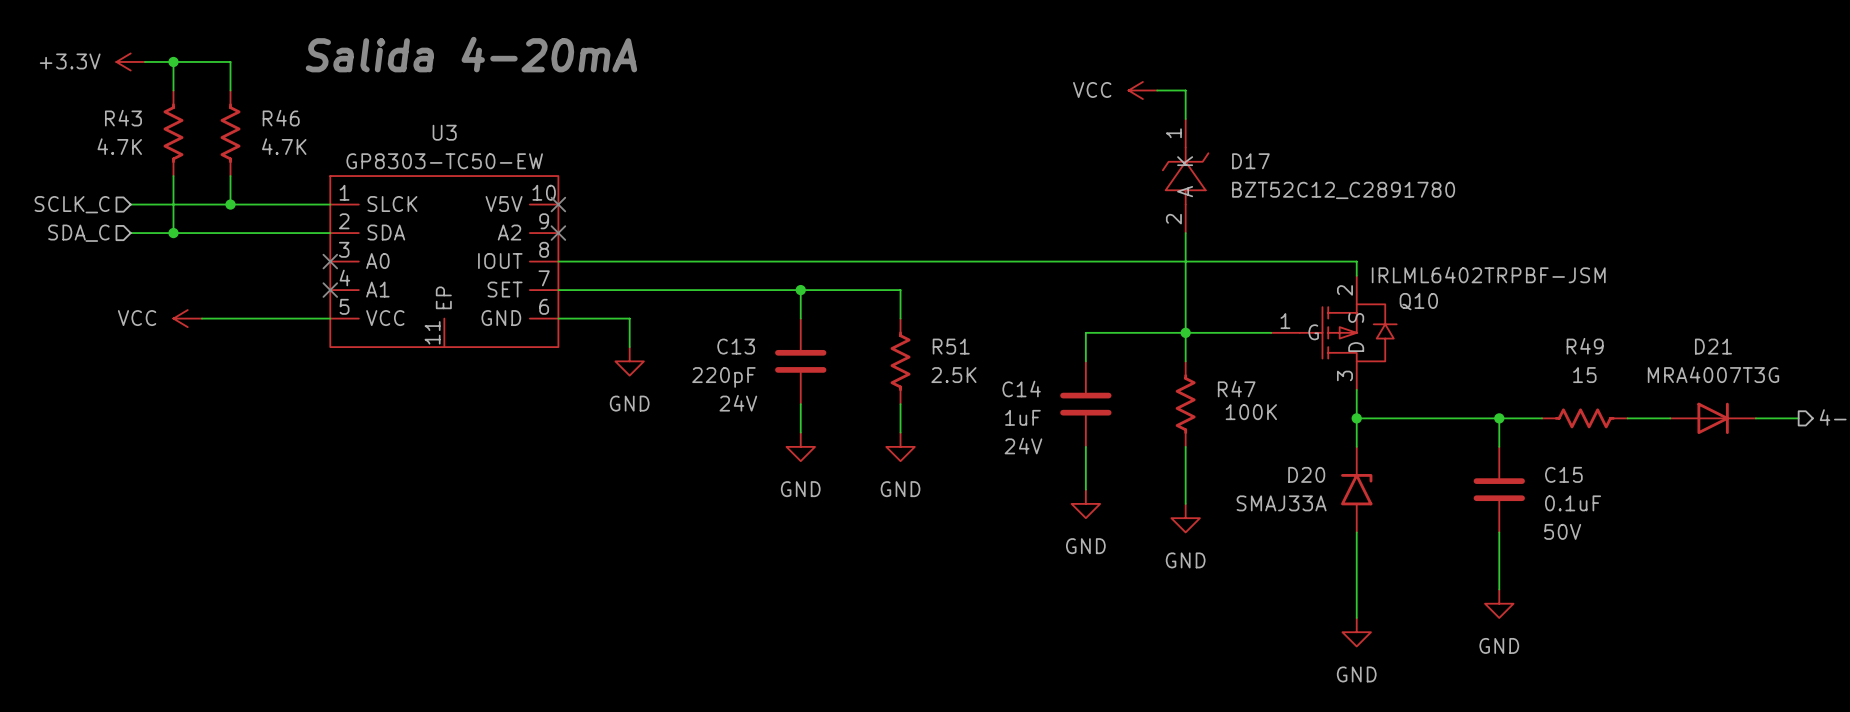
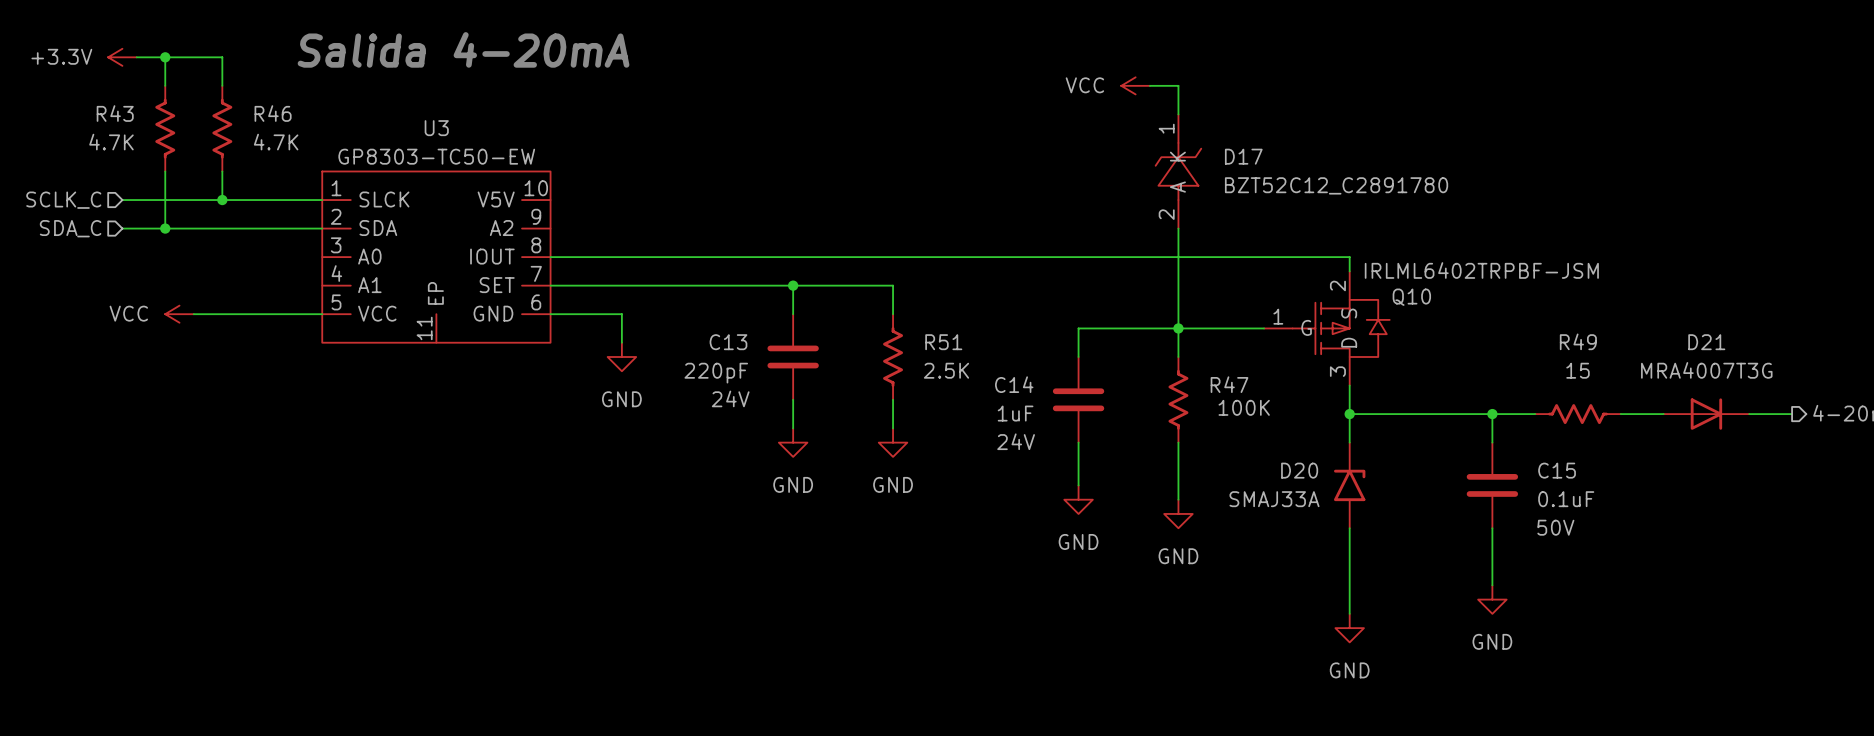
no-connect mark: (558, 204) -> none
no-connect mark: (558, 233) -> none
no-connect mark: (330, 261) -> none
no-connect mark: (330, 290) -> none

